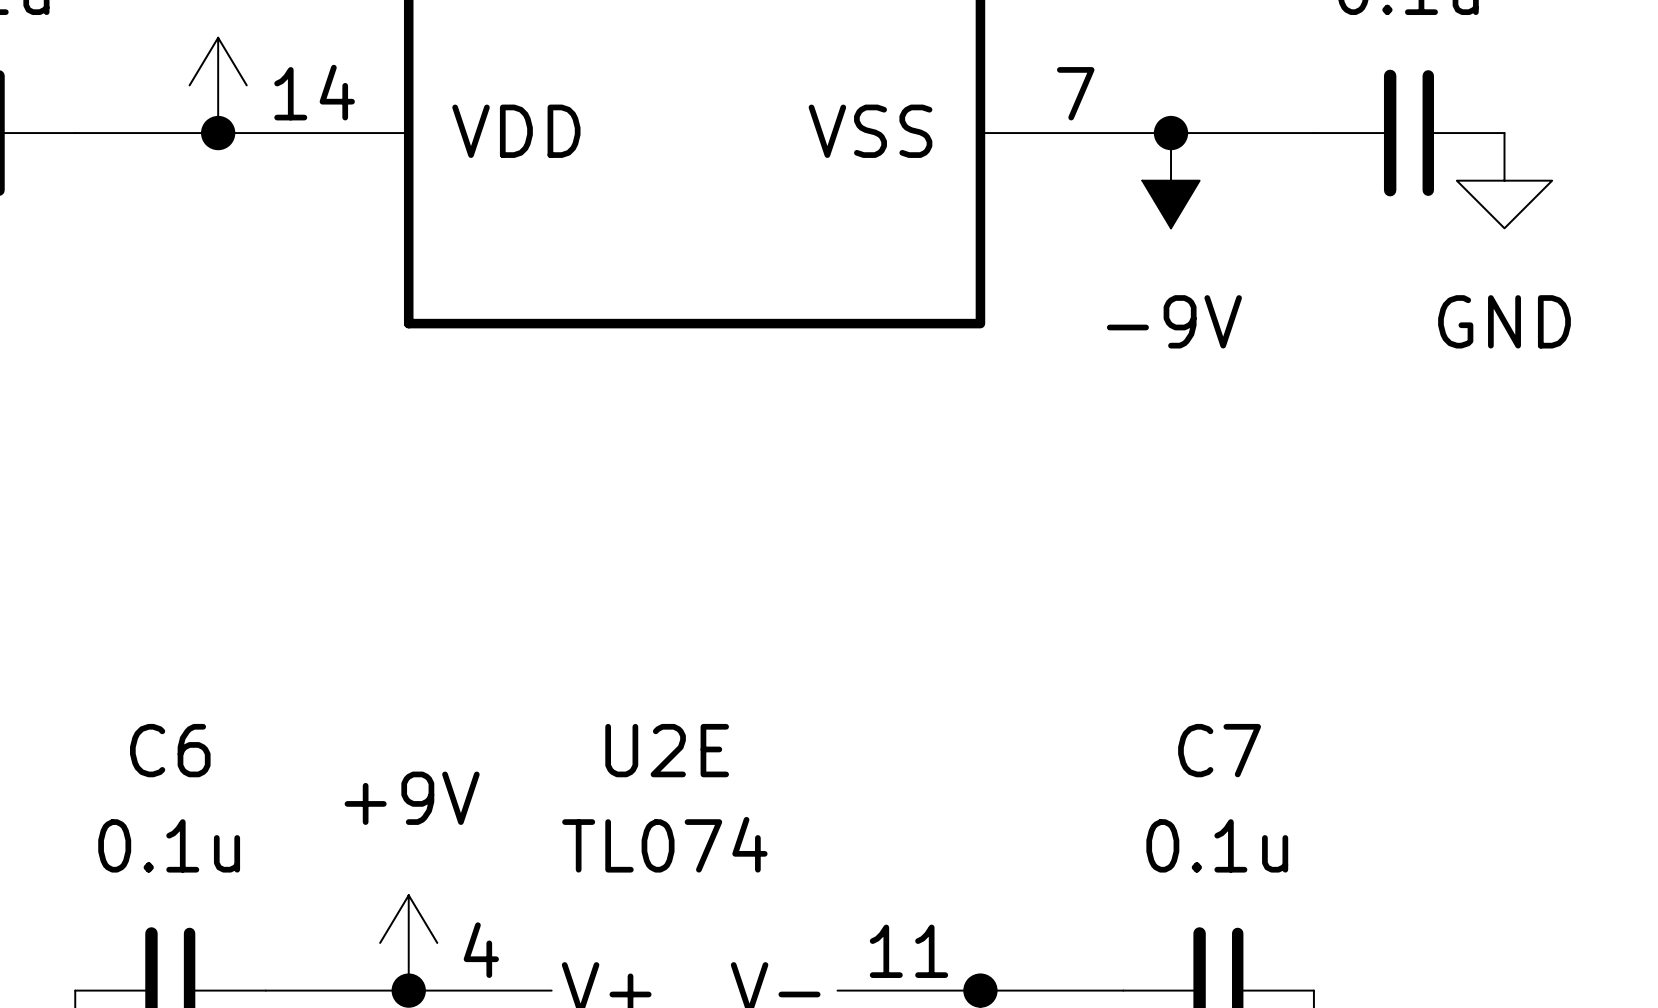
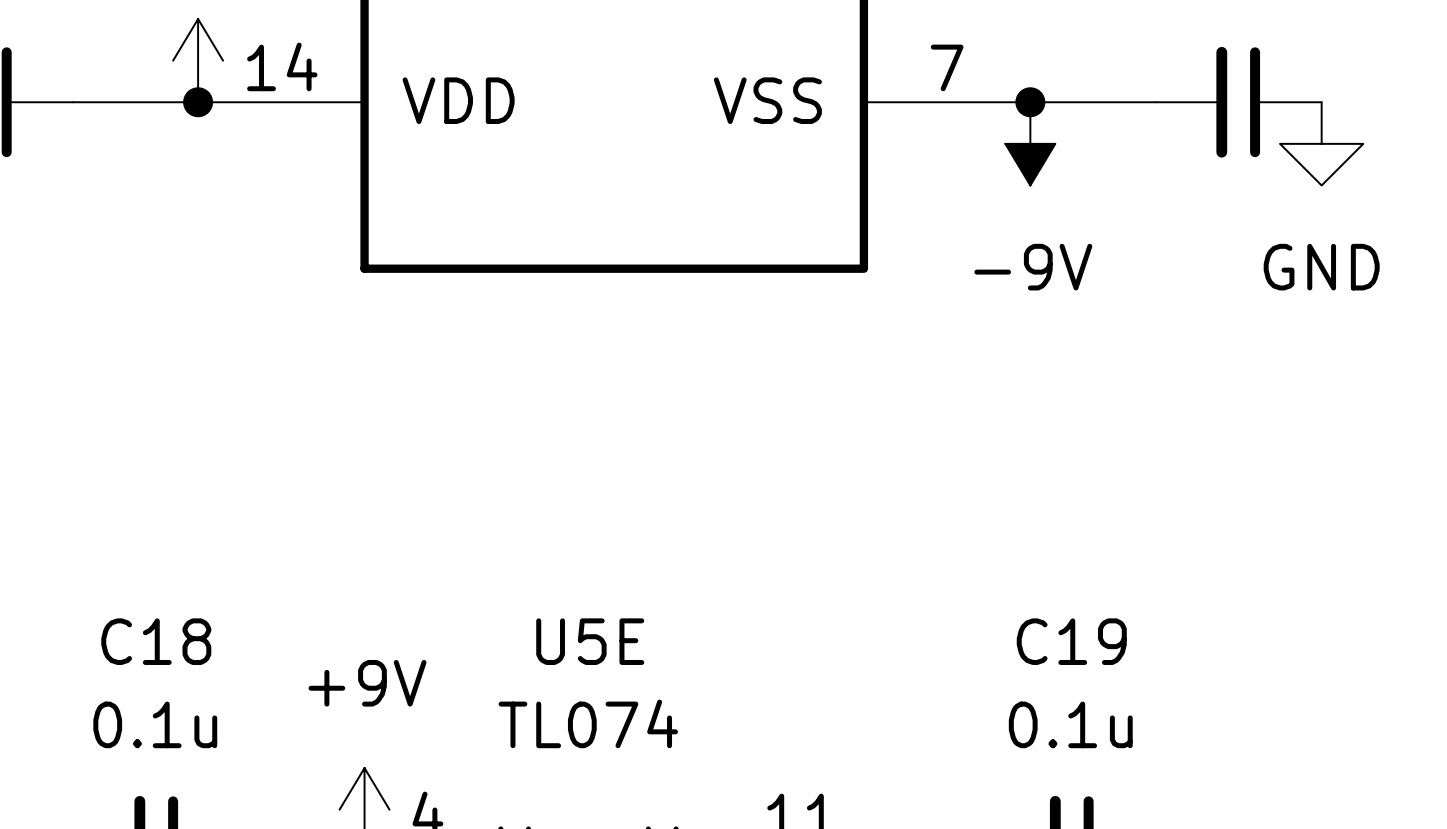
C6 name: C6 (170, 750) -> C18 (156, 641)
U2E name: U2E (667, 750) -> U5E (590, 641)
C7 name: C7 (1219, 750) -> C19 (1071, 641)

